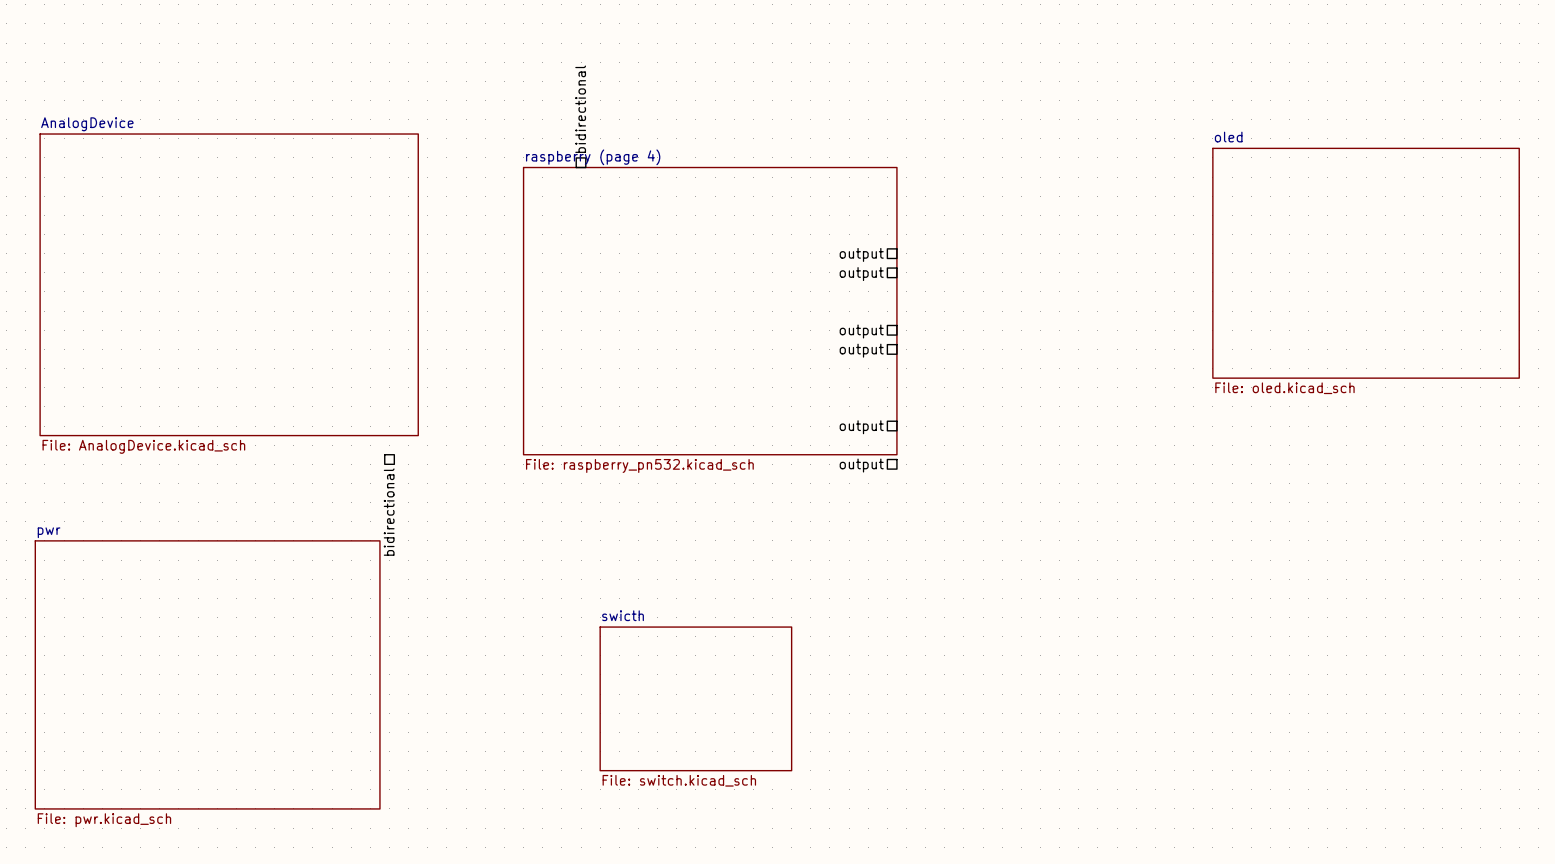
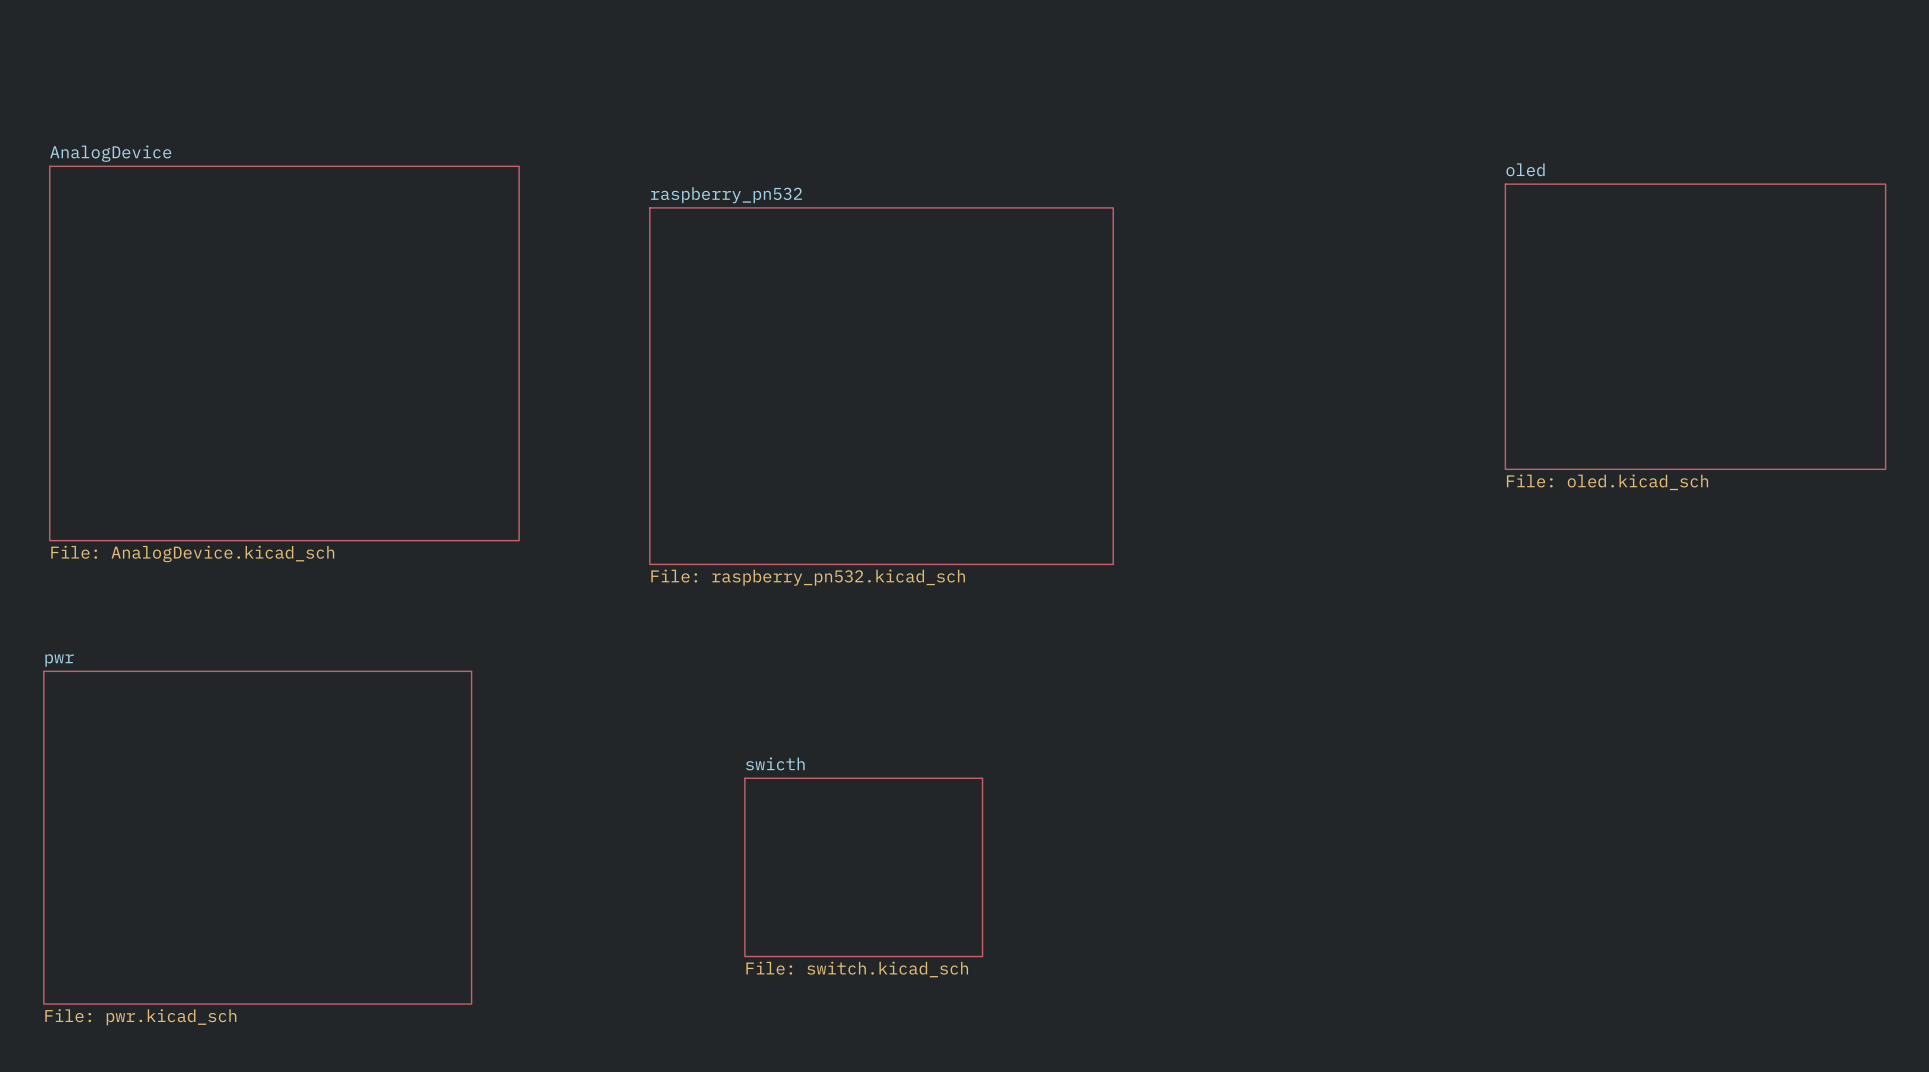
sheet pin: bidirectional (580, 109) -> none
sheet raspberry (page 4) name: raspberry (page 4) (593, 157) -> raspberry_pn532 (726, 195)
sheet pin: output (861, 254) -> none
sheet pin: output (861, 274) -> none
sheet pin: output (861, 331) -> none
sheet pin: output (861, 350) -> none
sheet pin: output (861, 427) -> none
sheet pin: output (861, 465) -> none
sheet pin: bidirectional (389, 512) -> none

